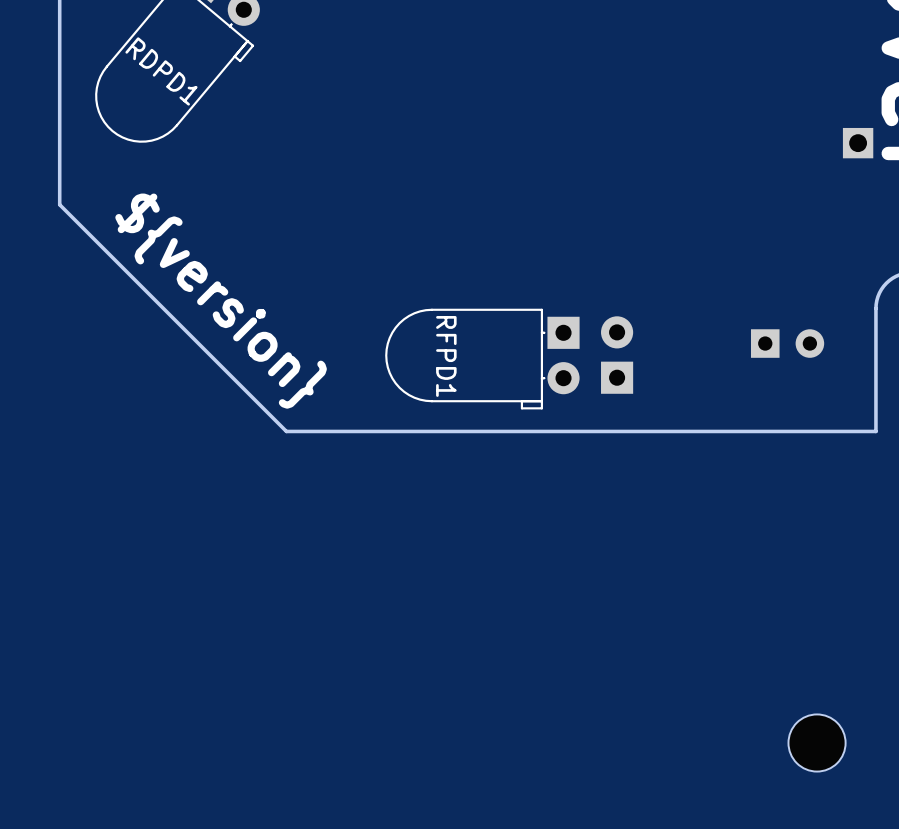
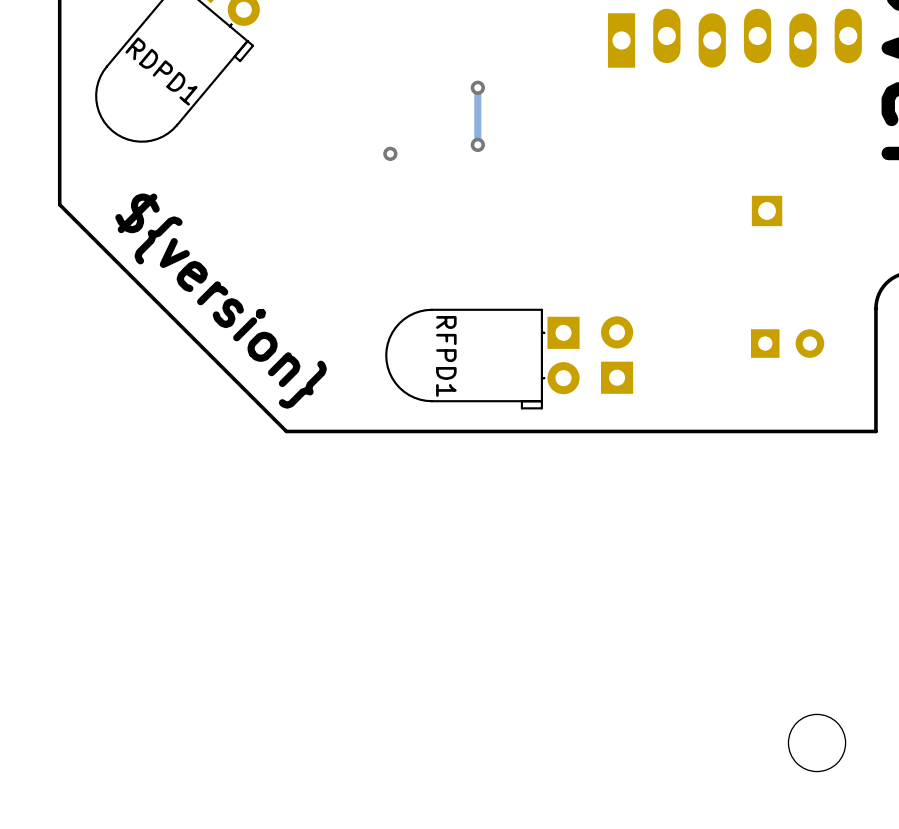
part: none -> (734, 38)
track: none -> (477, 87) (477, 144)
via: none -> (477, 87)
part position: (858, 143) -> (767, 210)
via: none -> (477, 144)
via: none -> (390, 153)

